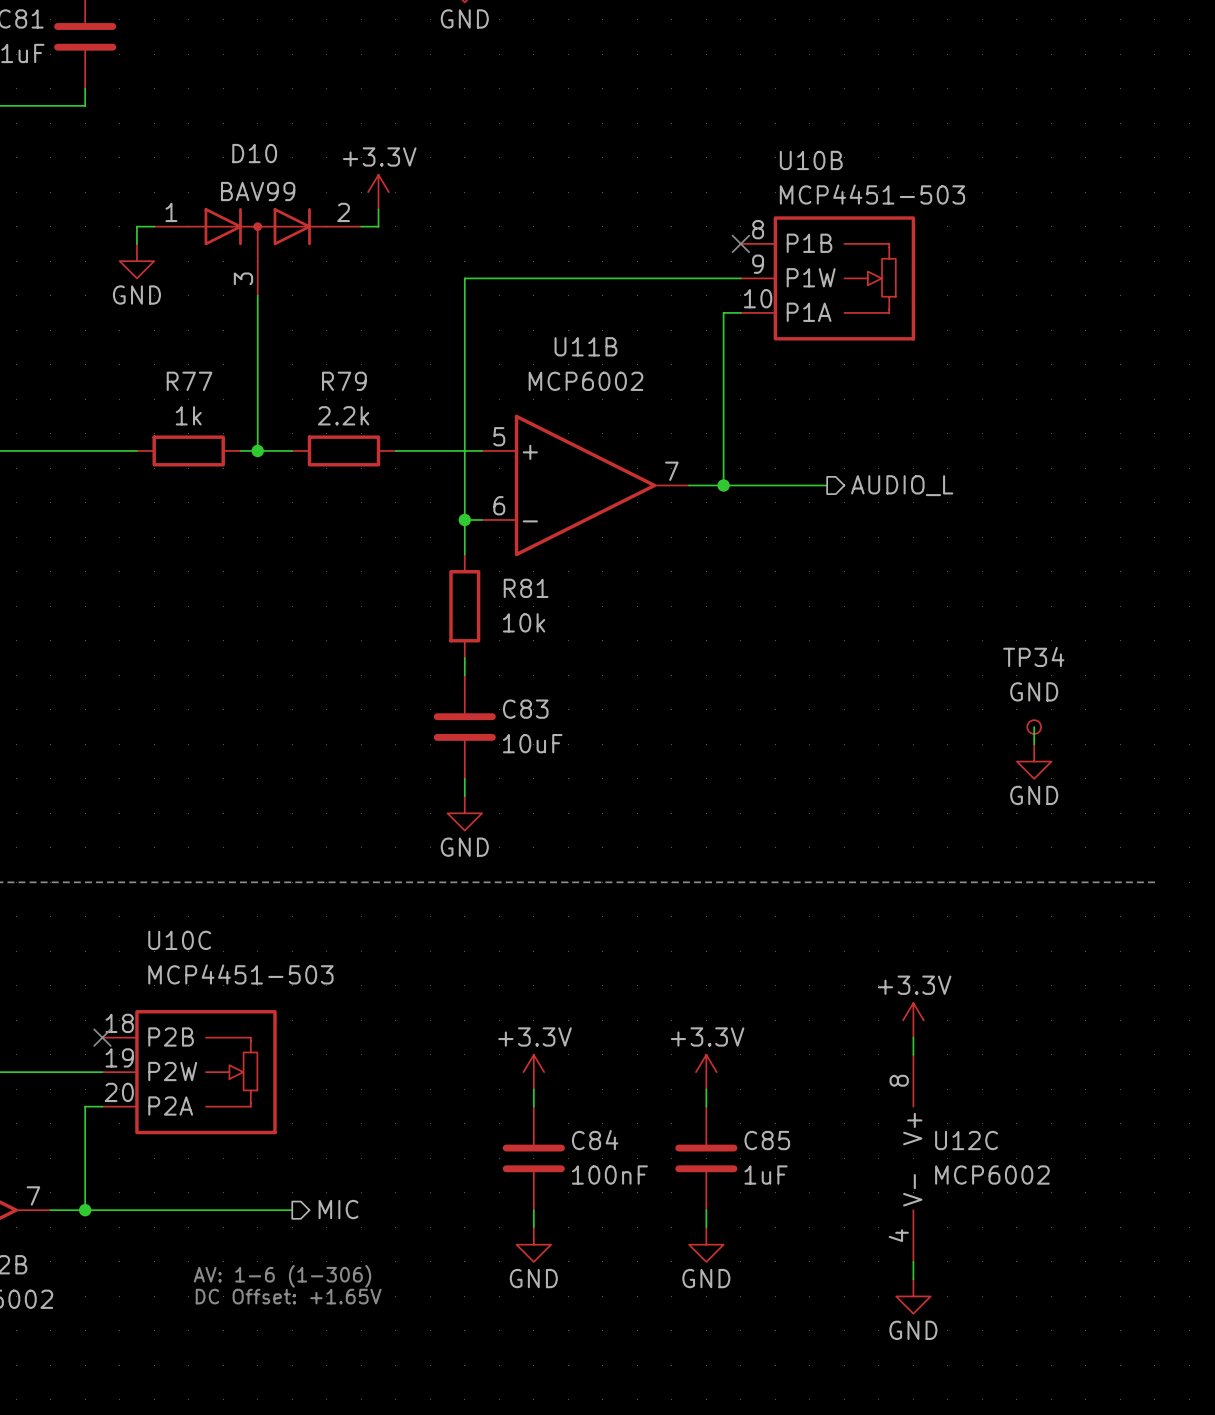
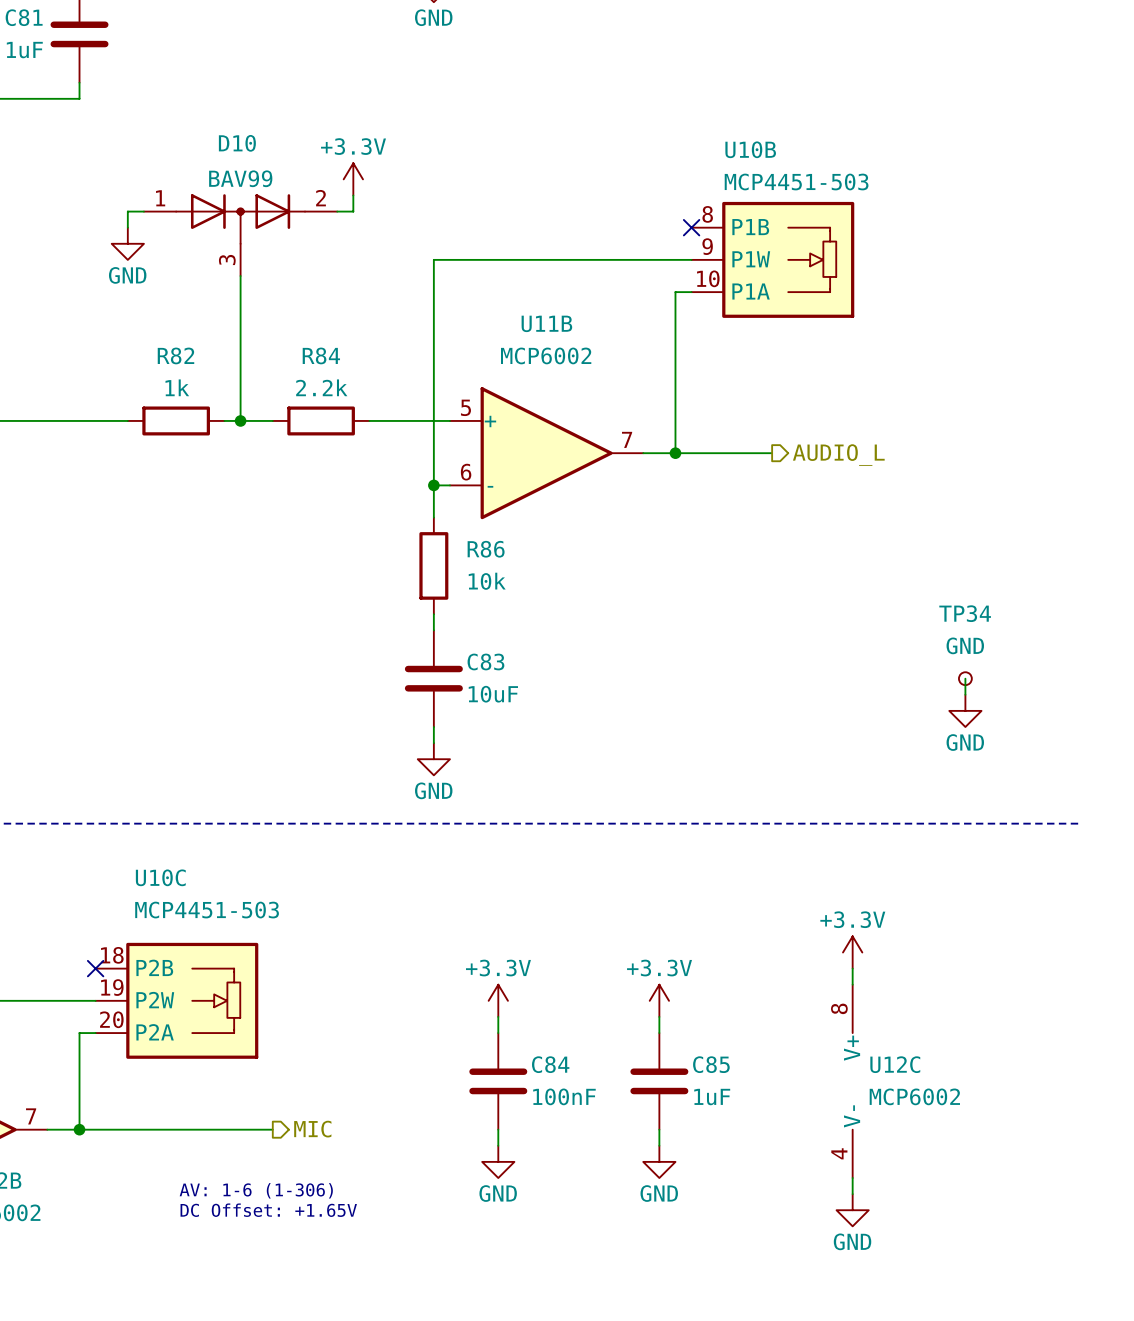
R77 name: R77 (189, 381) -> R82 (175, 355)
R79 name: R79 (344, 381) -> R84 (321, 355)
R81 name: R81 (526, 588) -> R86 (486, 549)

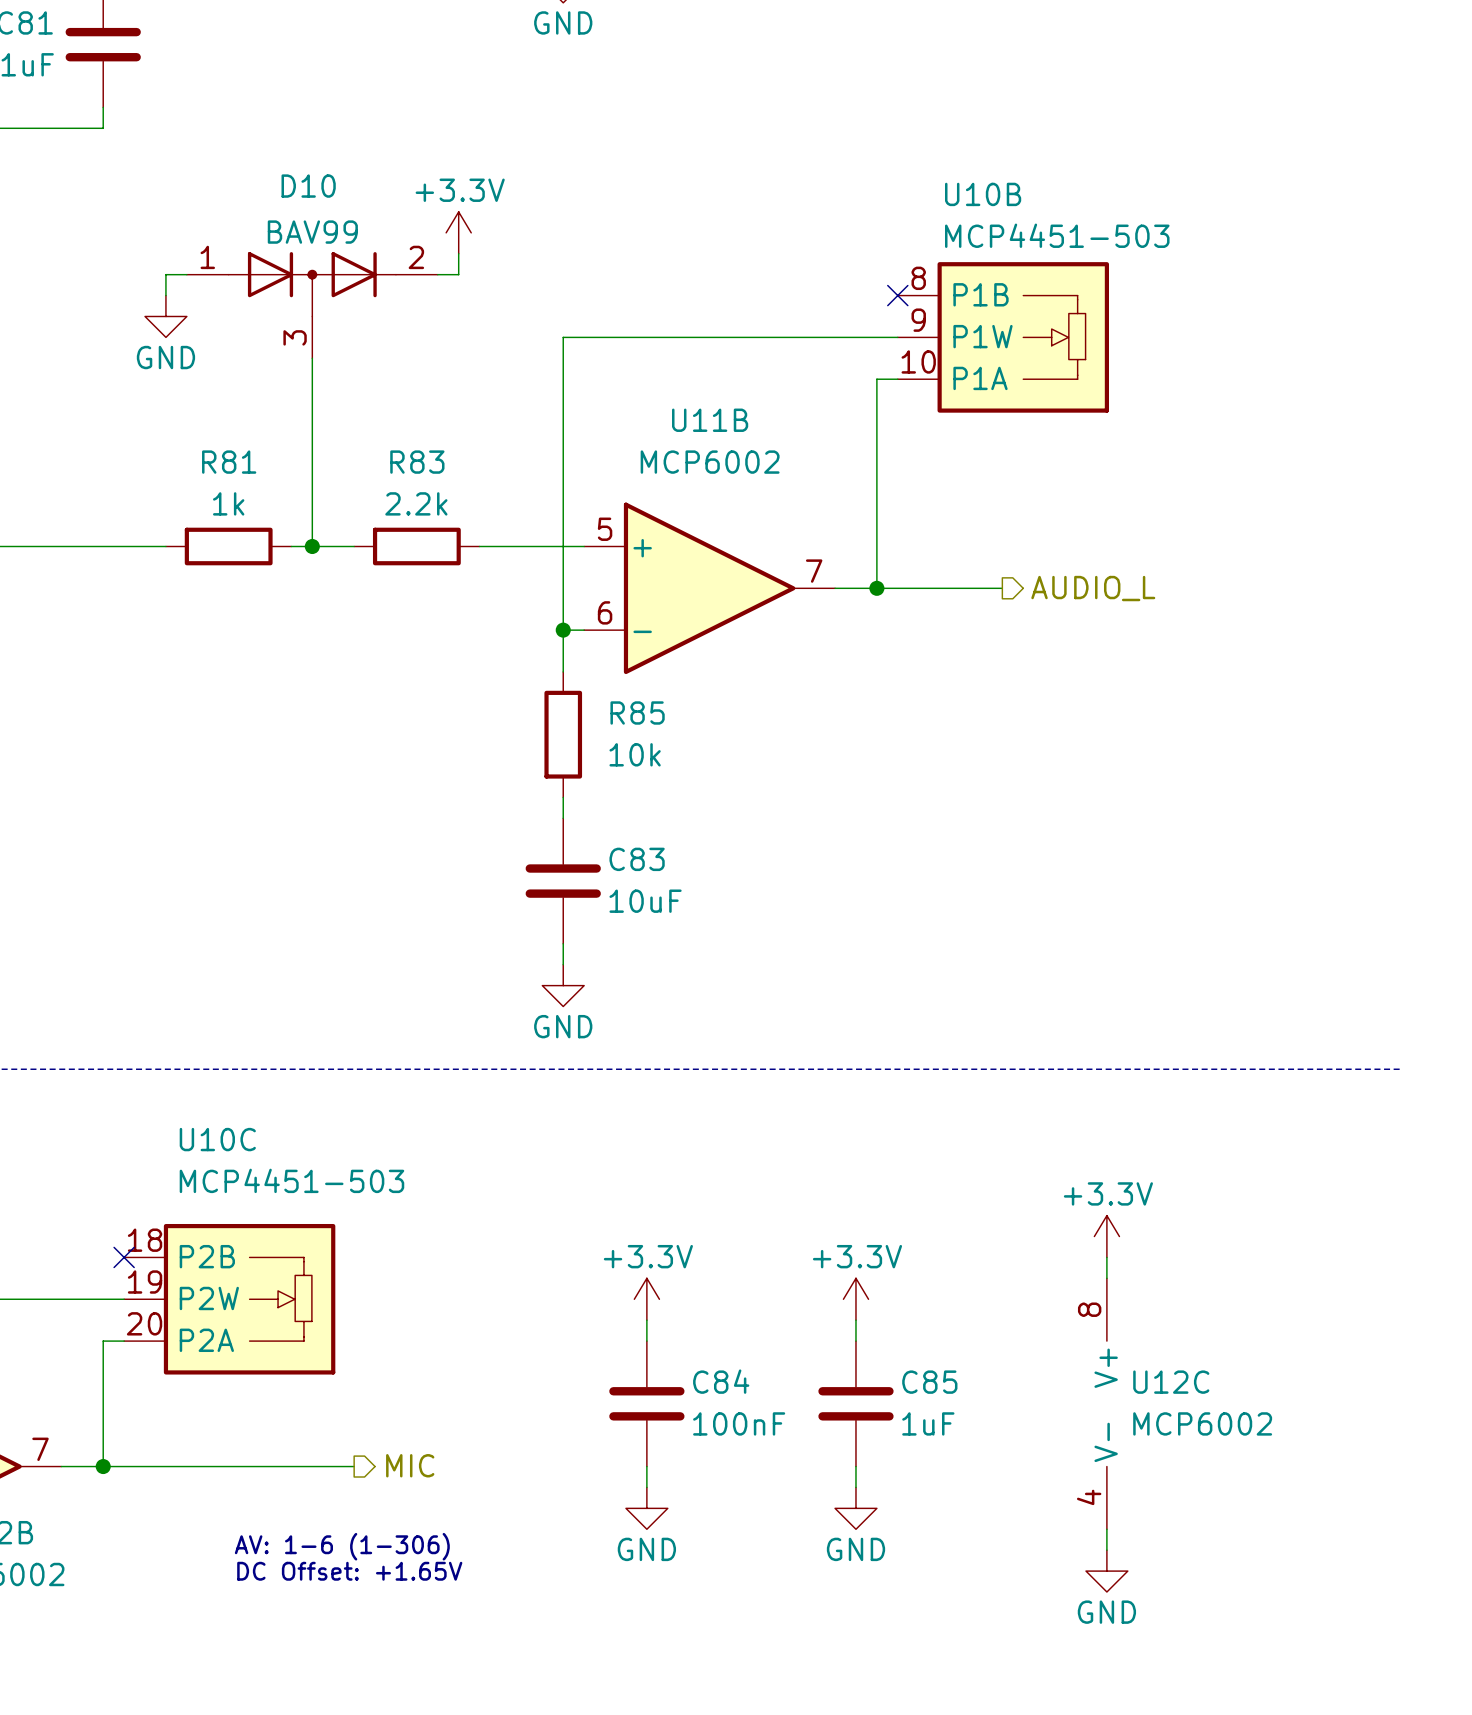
R82 name: R82 (175, 355) -> R81 (229, 462)
R84 name: R84 (321, 355) -> R83 (417, 462)
R86 name: R86 (486, 549) -> R85 (637, 713)
wire: (965, 678) (965, 694) -> none
TP34: GND (965, 678) -> none
power symbol: GND (965, 710) -> none

